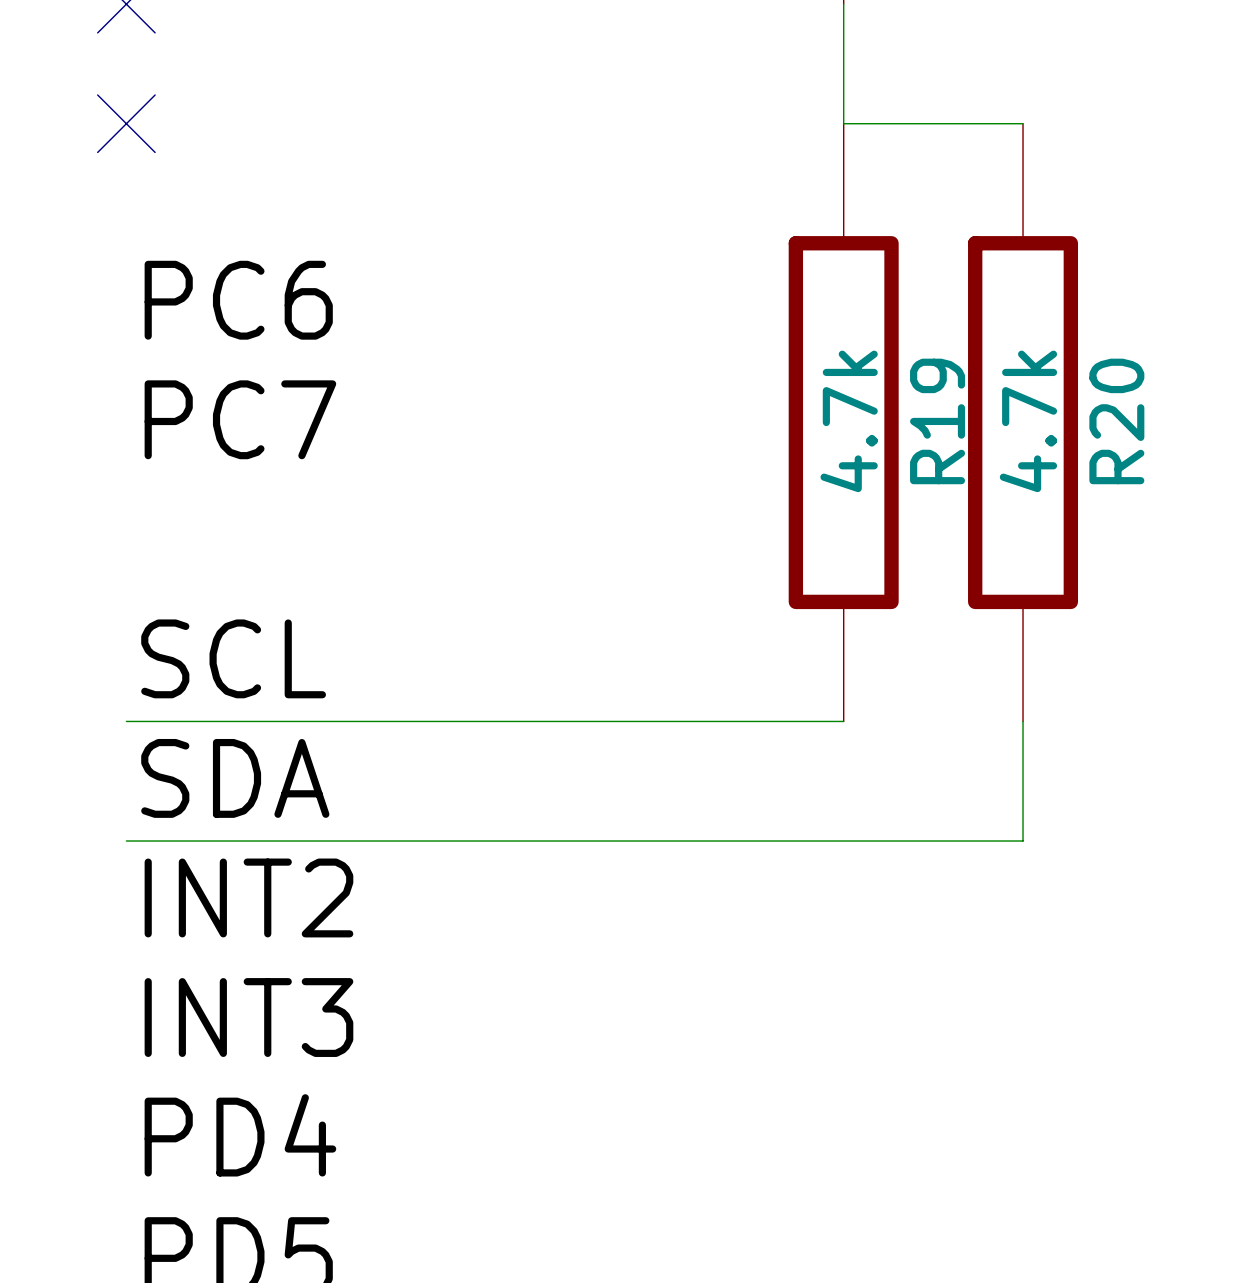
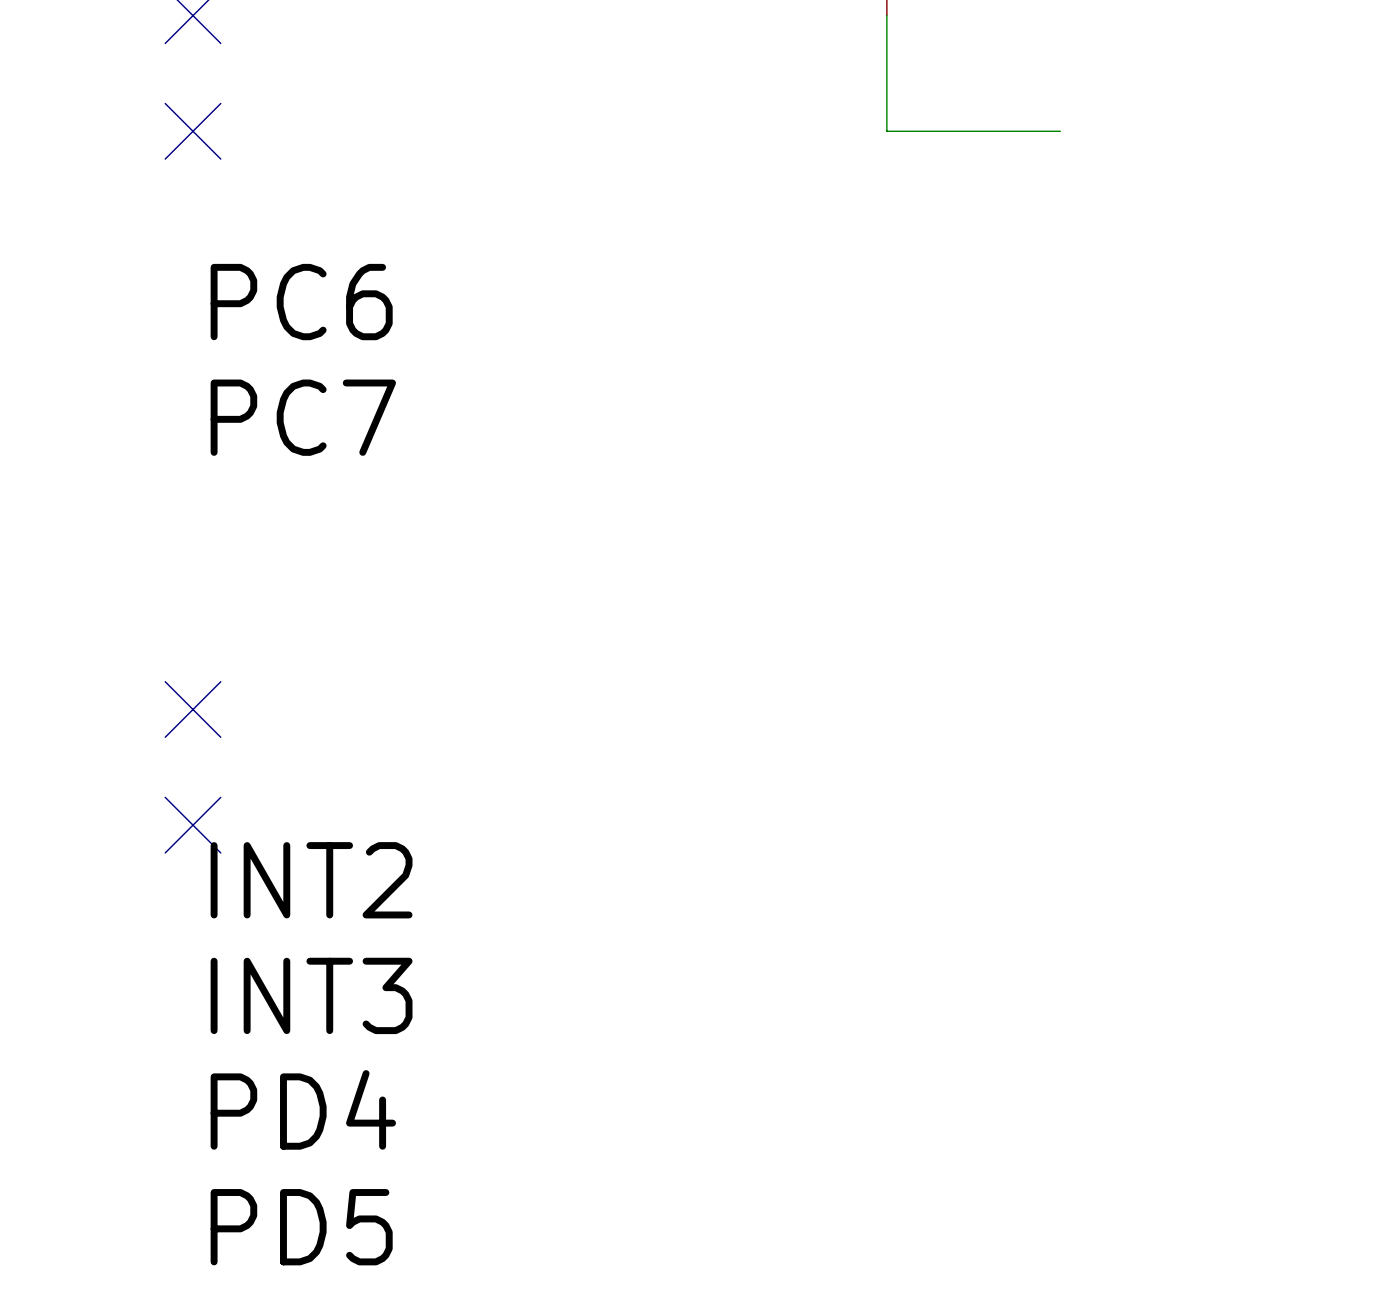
R19: 4.7k (843, 422) -> none
R20: 4.7k (1023, 422) -> none
label: SCL (233, 658) -> none
wire: (126, 721) (843, 721) -> none
no-connect mark: none -> (193, 709)
wire: (1023, 721) (1023, 841) (126, 841) -> none
label: SDA (235, 778) -> none
no-connect mark: none -> (193, 825)

